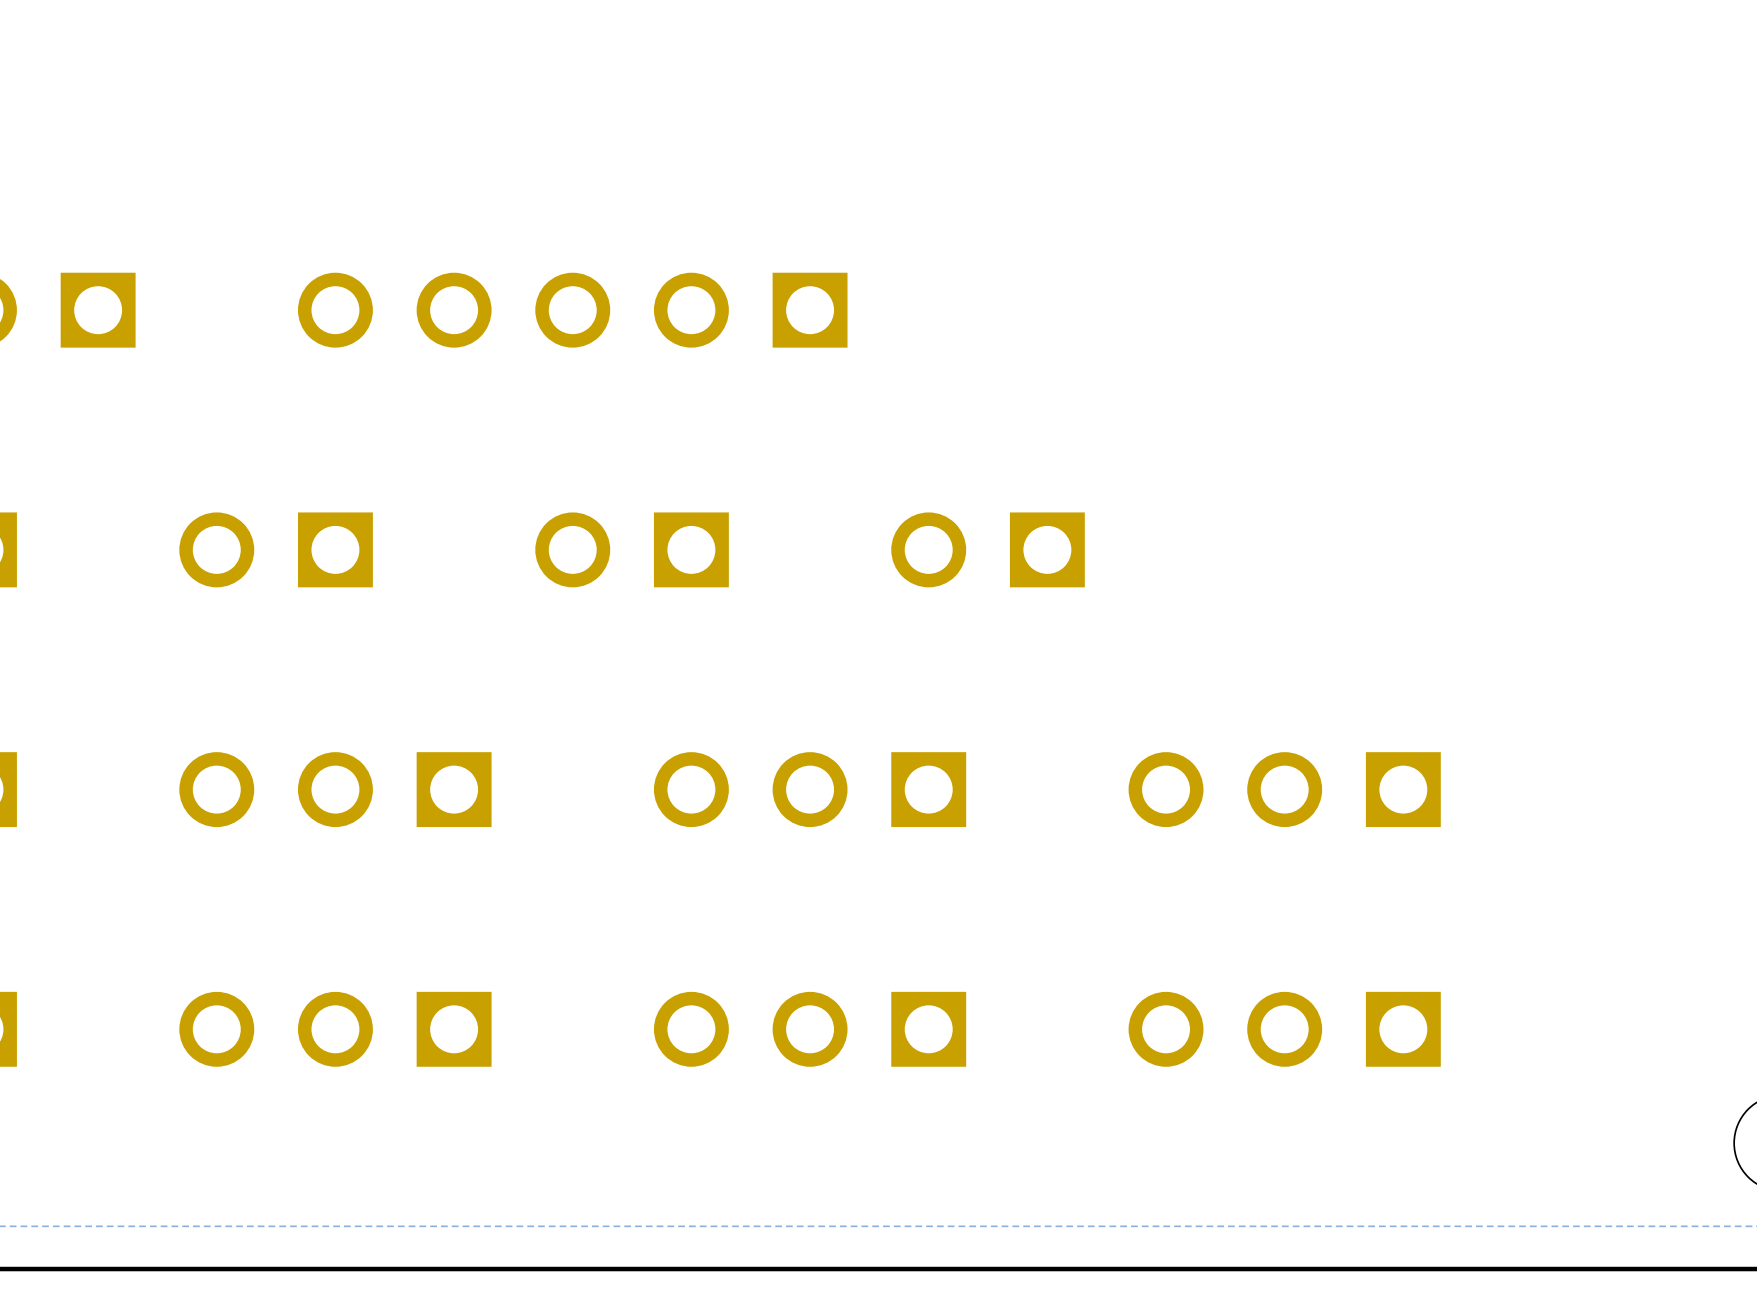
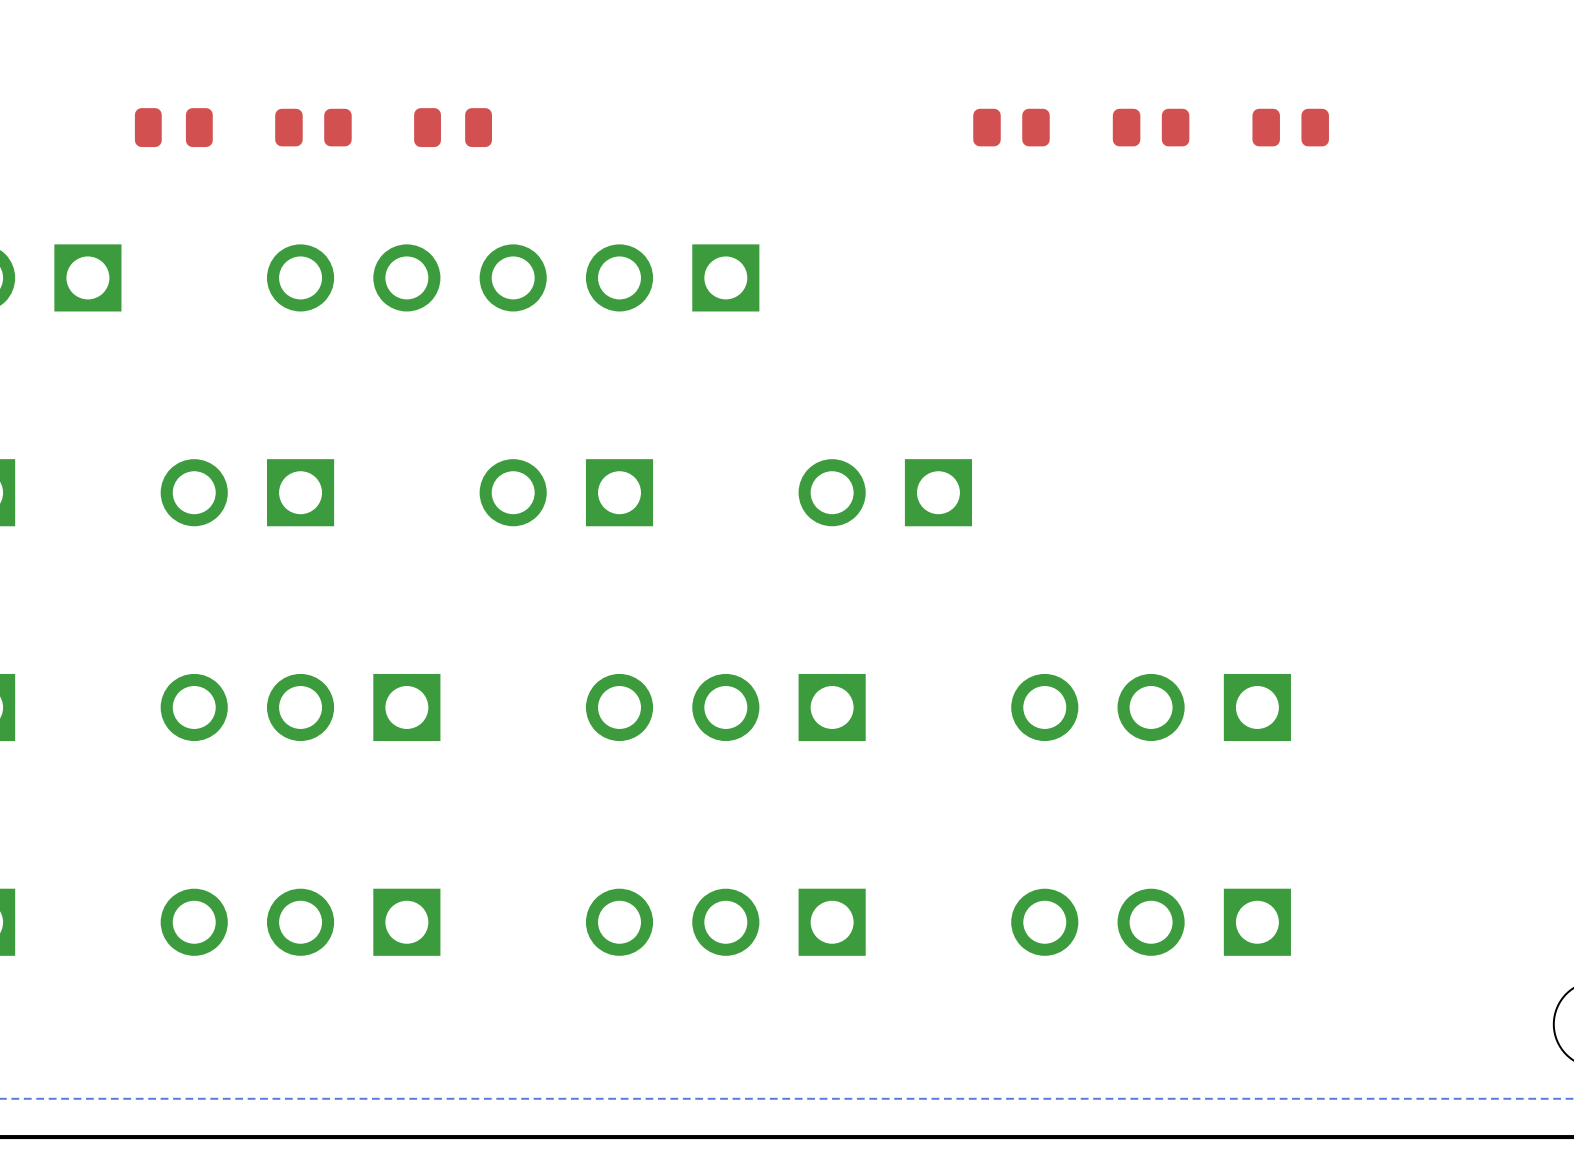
part: none -> (173, 127)
part: none -> (313, 127)
part: none -> (453, 127)
part: none -> (1011, 127)
part: none -> (1151, 127)
part: none -> (1290, 127)

